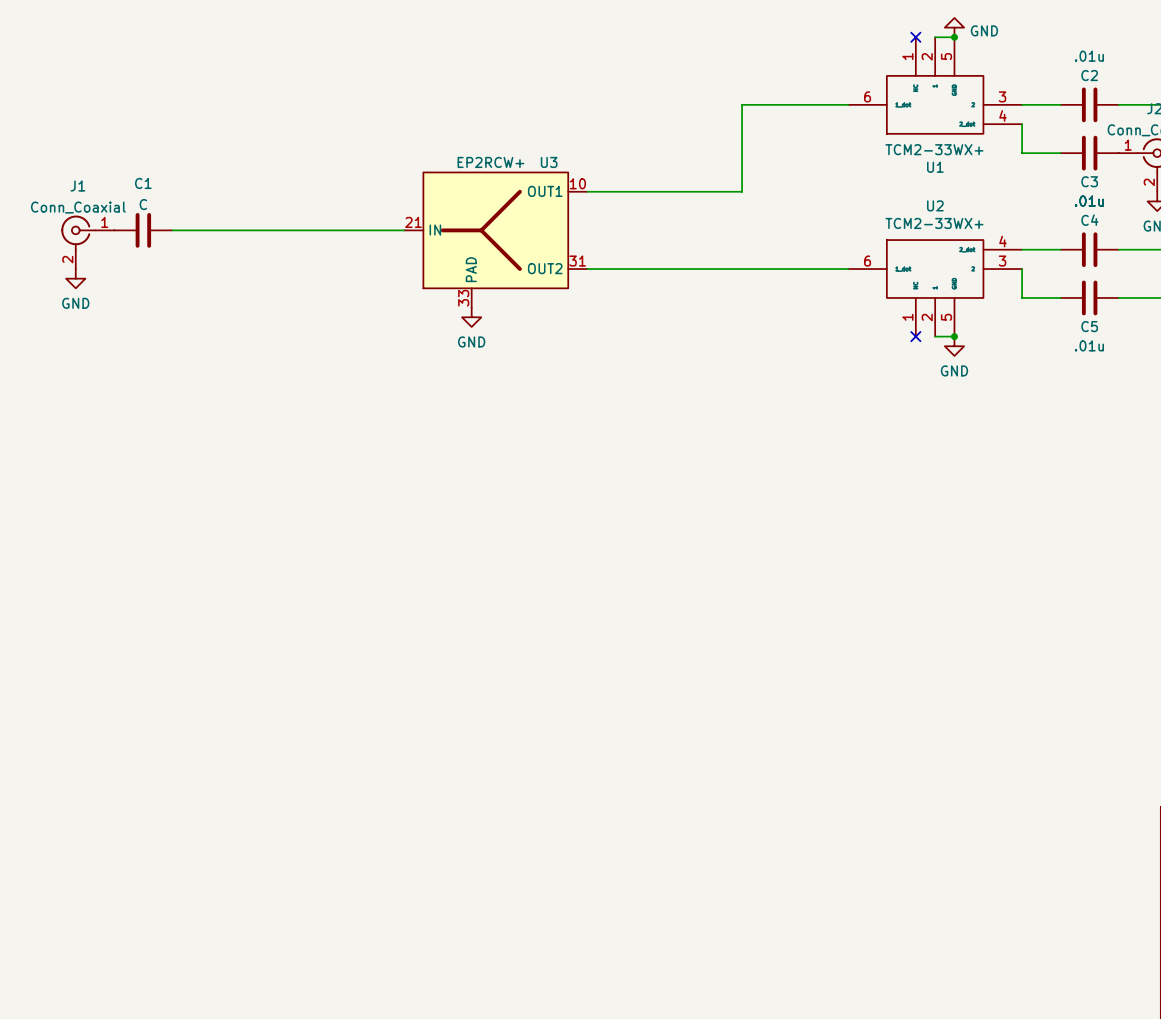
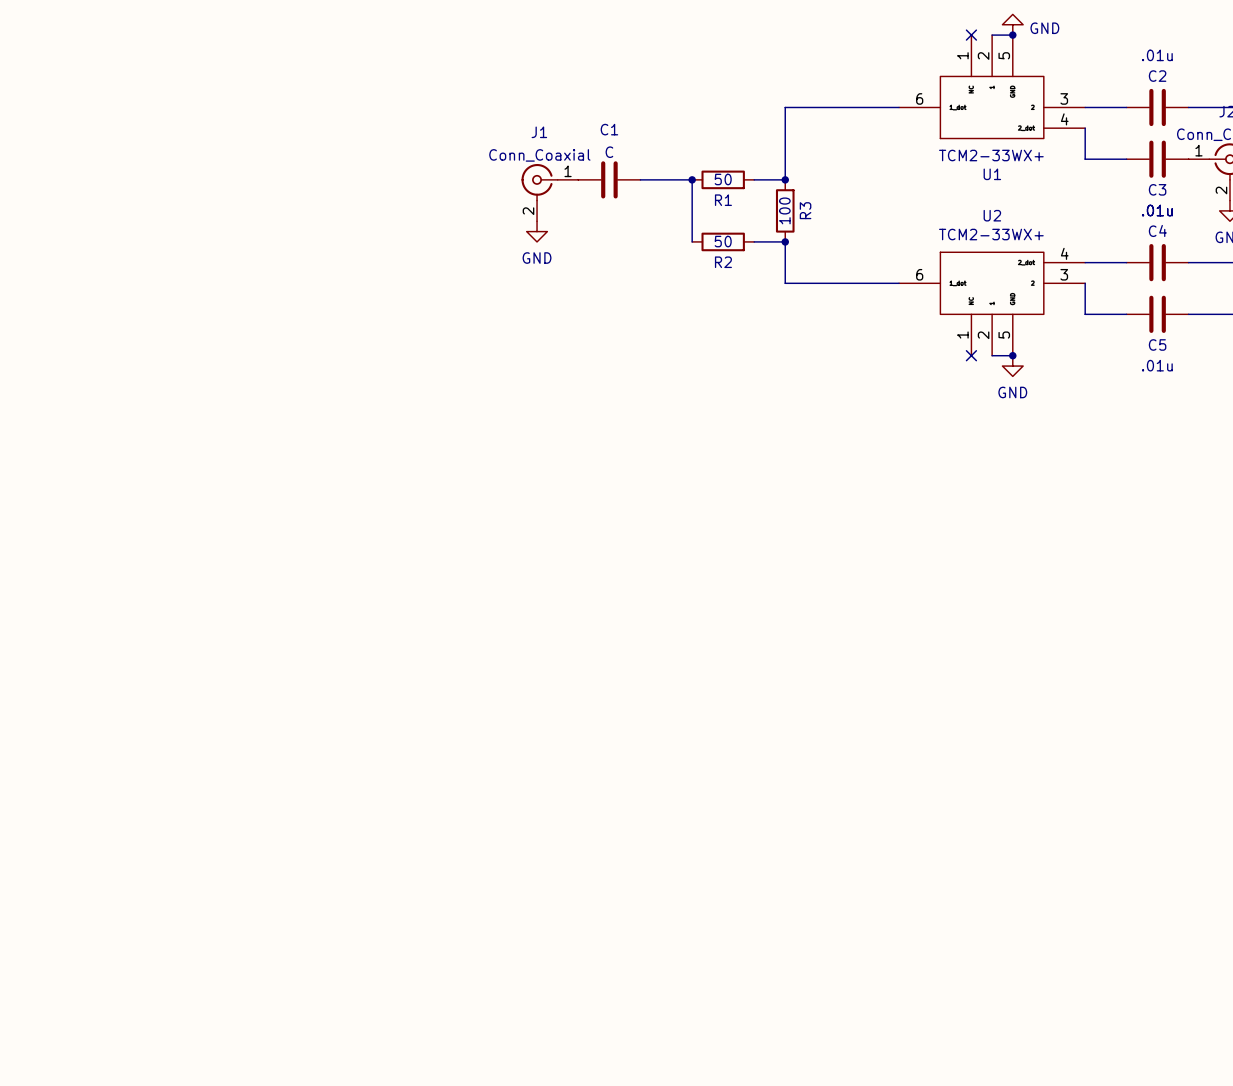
wire: none -> (640, 179) (692, 179) (692, 241)
junction: none -> (692, 179)
R1: none -> 50 (723, 179)
wire: (742, 172) (742, 191) (587, 191) -> (785, 179) (754, 179)
junction: none -> (785, 179)
R3: none -> 100 (785, 210)
C1 position: (143, 230) -> (609, 179)
wire: (172, 230) (404, 230) -> none
R2: none -> 50 (723, 241)
junction: none -> (785, 241)
U3: EP2RCW+ (495, 240) -> none
J1 position: (87, 242) -> (549, 192)
wire: (587, 269) (742, 269) -> (754, 241) (785, 241) (785, 283)
power symbol: GND (75, 278) -> none
power symbol position: GND (471, 317) -> GND (537, 231)

